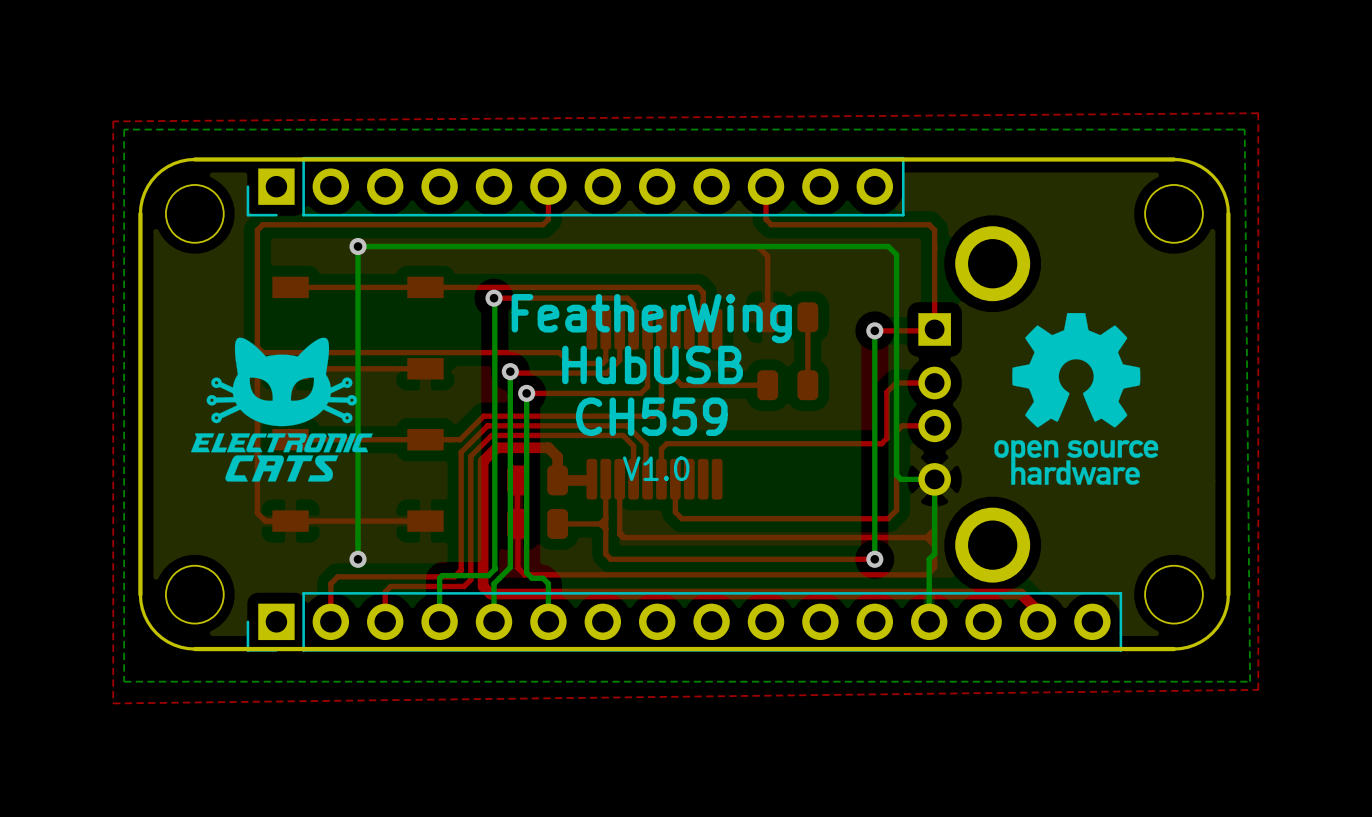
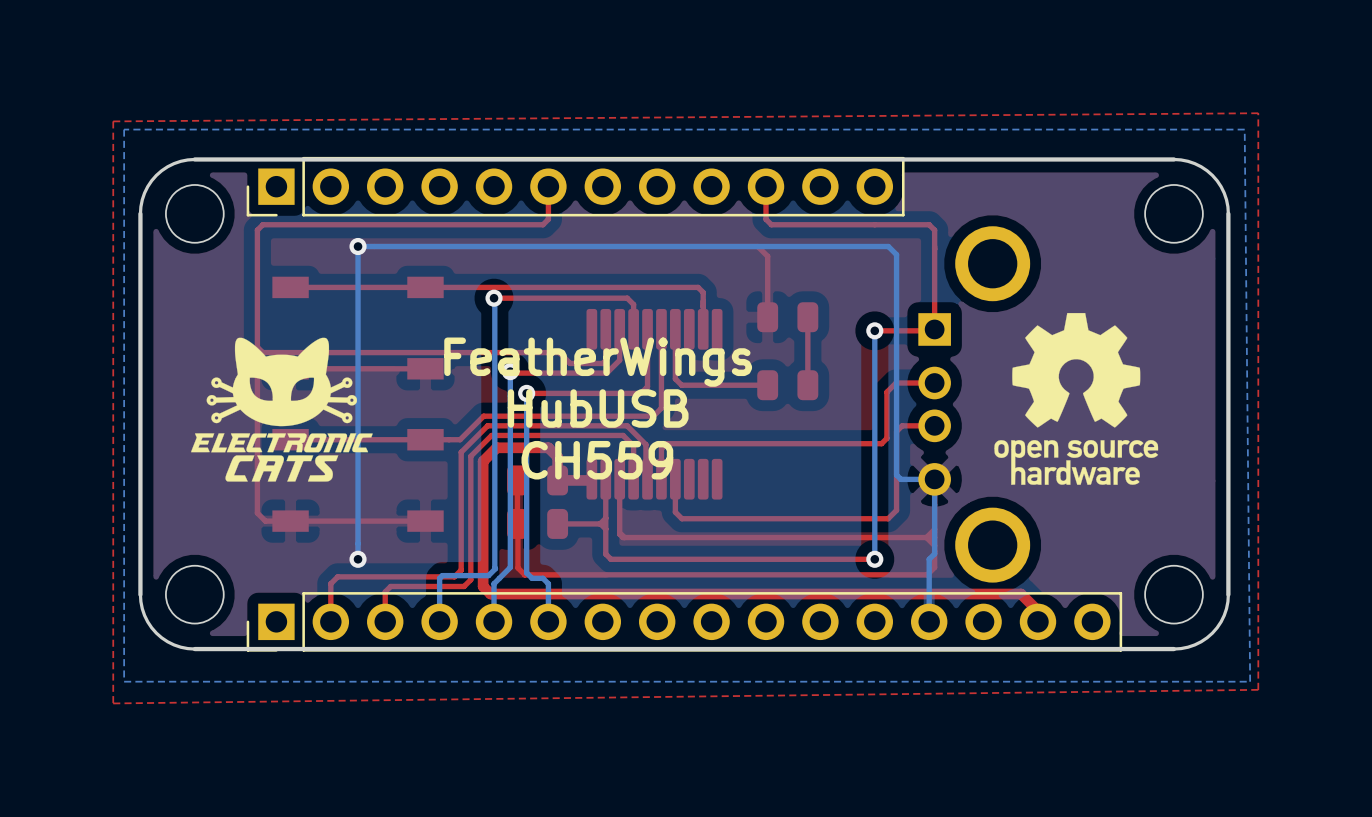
text: FeatherWing (651, 318) -> FeatherWings (598, 362)
text position: HubUSB (652, 364) -> HubUSB (598, 408)
text position: CH559 (651, 416) -> CH559 (597, 460)
text: V1.0 (656, 468) -> none

